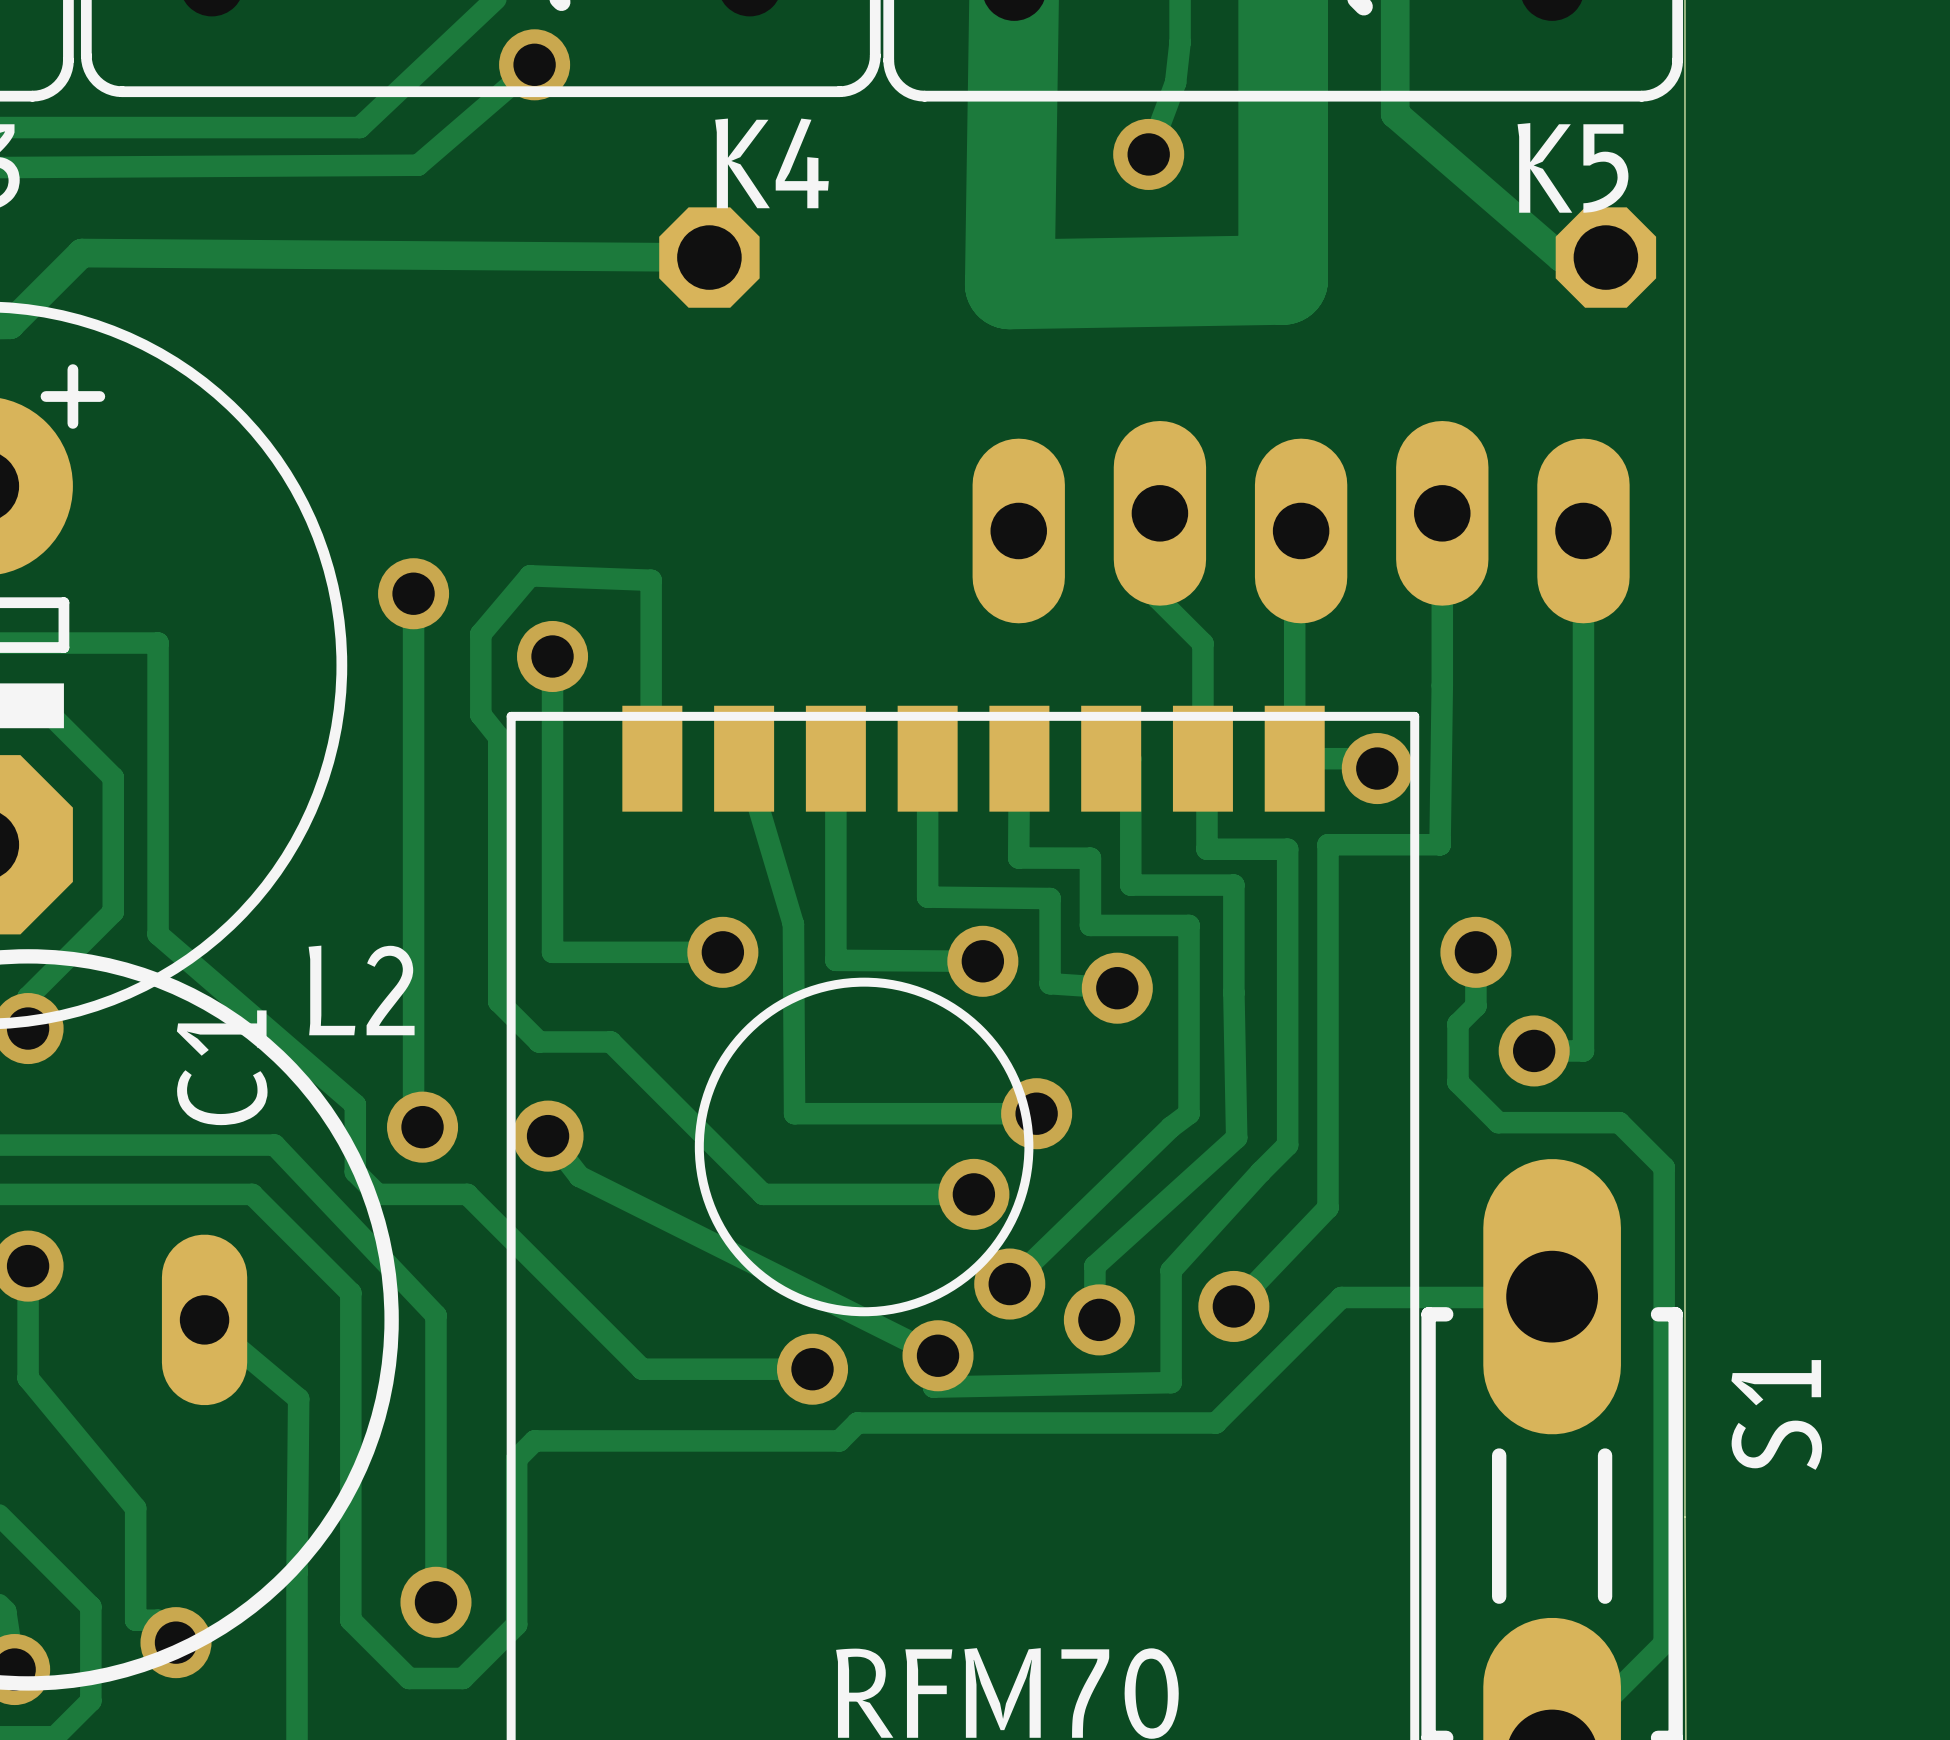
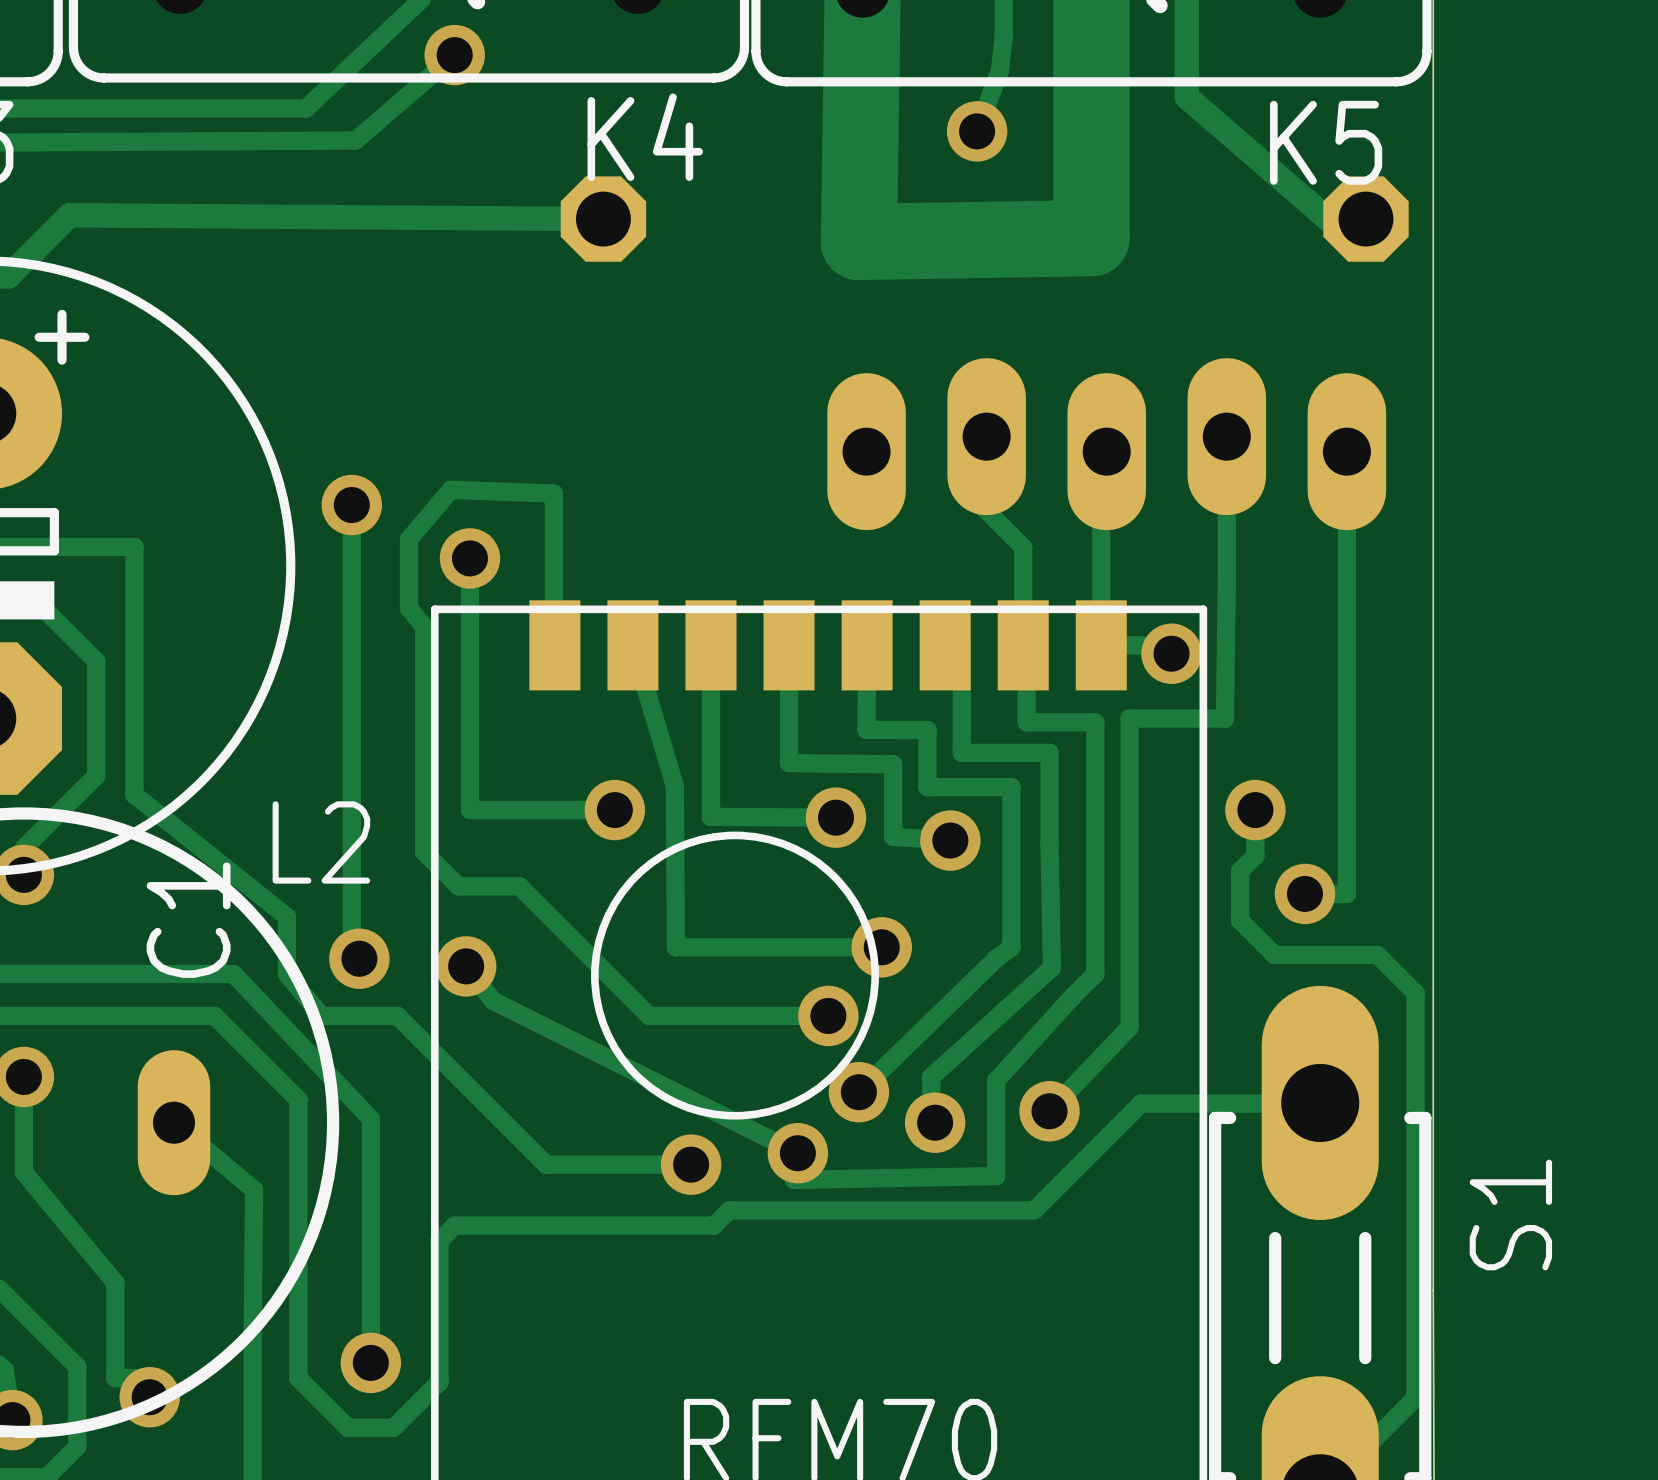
track: (158, 934) (355, 1104) (355, 1171) (377, 1194) -> (134, 794) (286, 916) (286, 974) (321, 1015)

